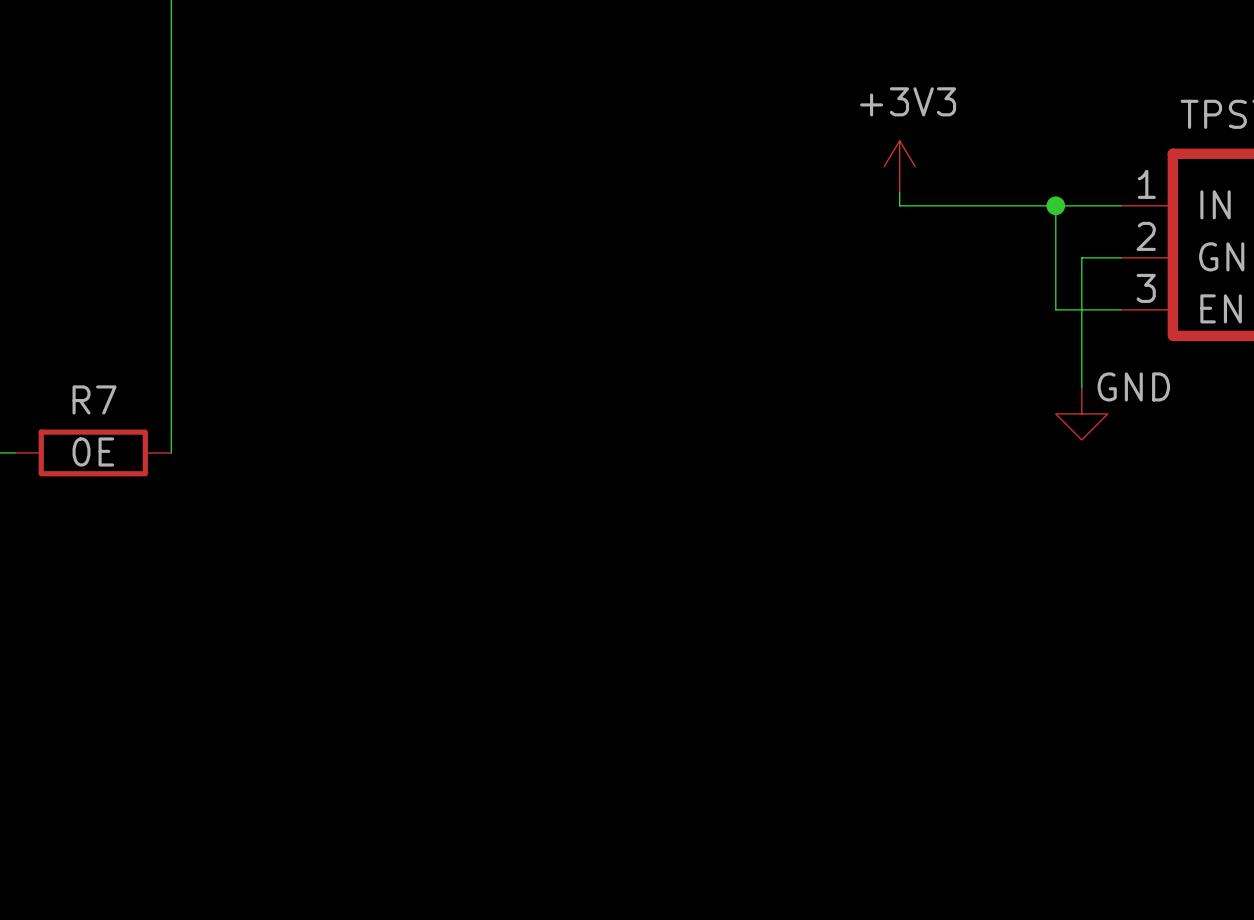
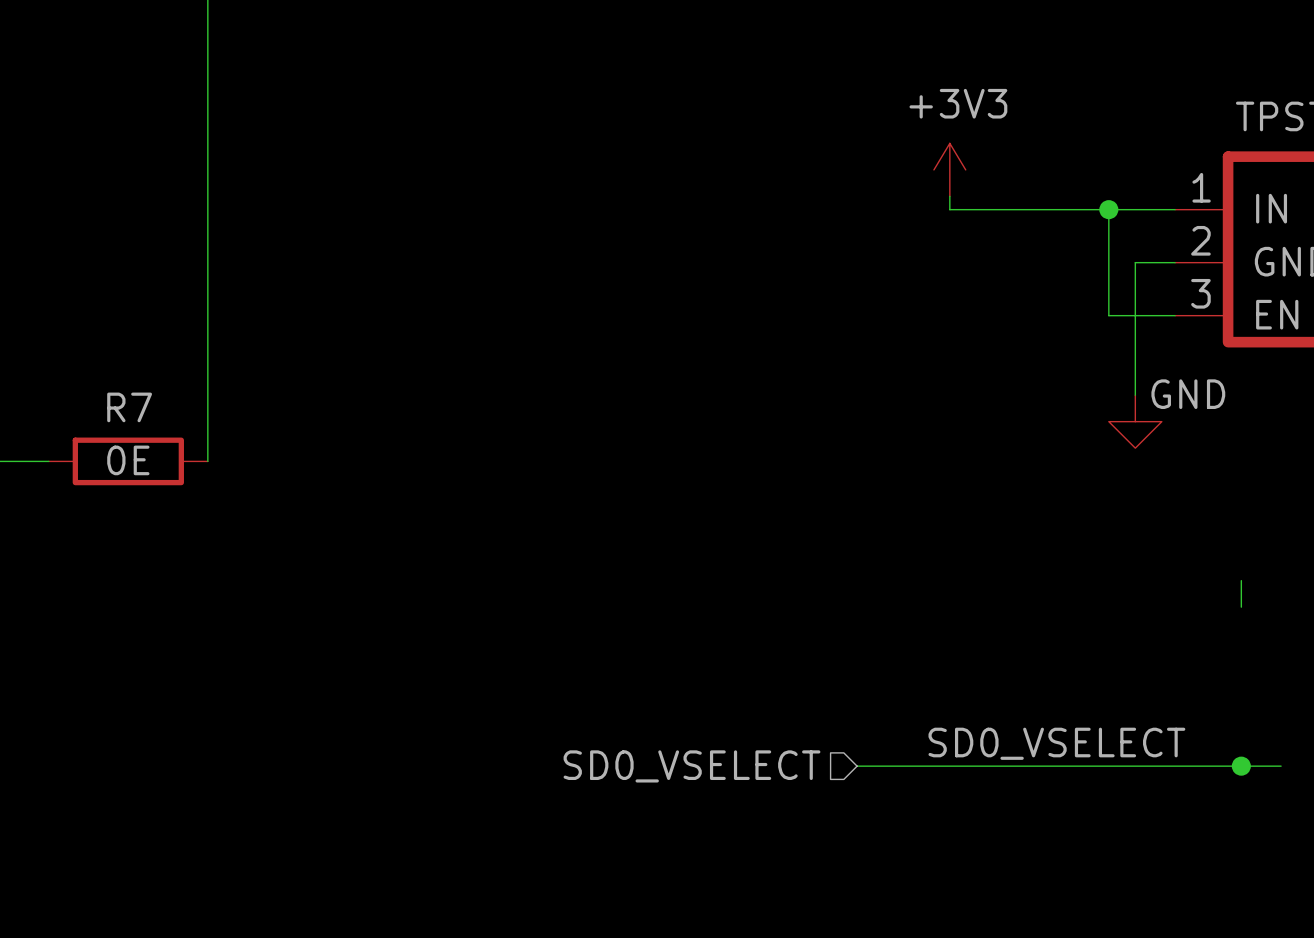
wire: none -> (1241, 580) (1241, 607)
label: none -> SD0_VSELECT (1056, 743)
hierarchical label: none -> SD0_VSELECT (691, 766)
wire: none -> (857, 766) (1281, 766)
junction: none -> (1241, 766)

